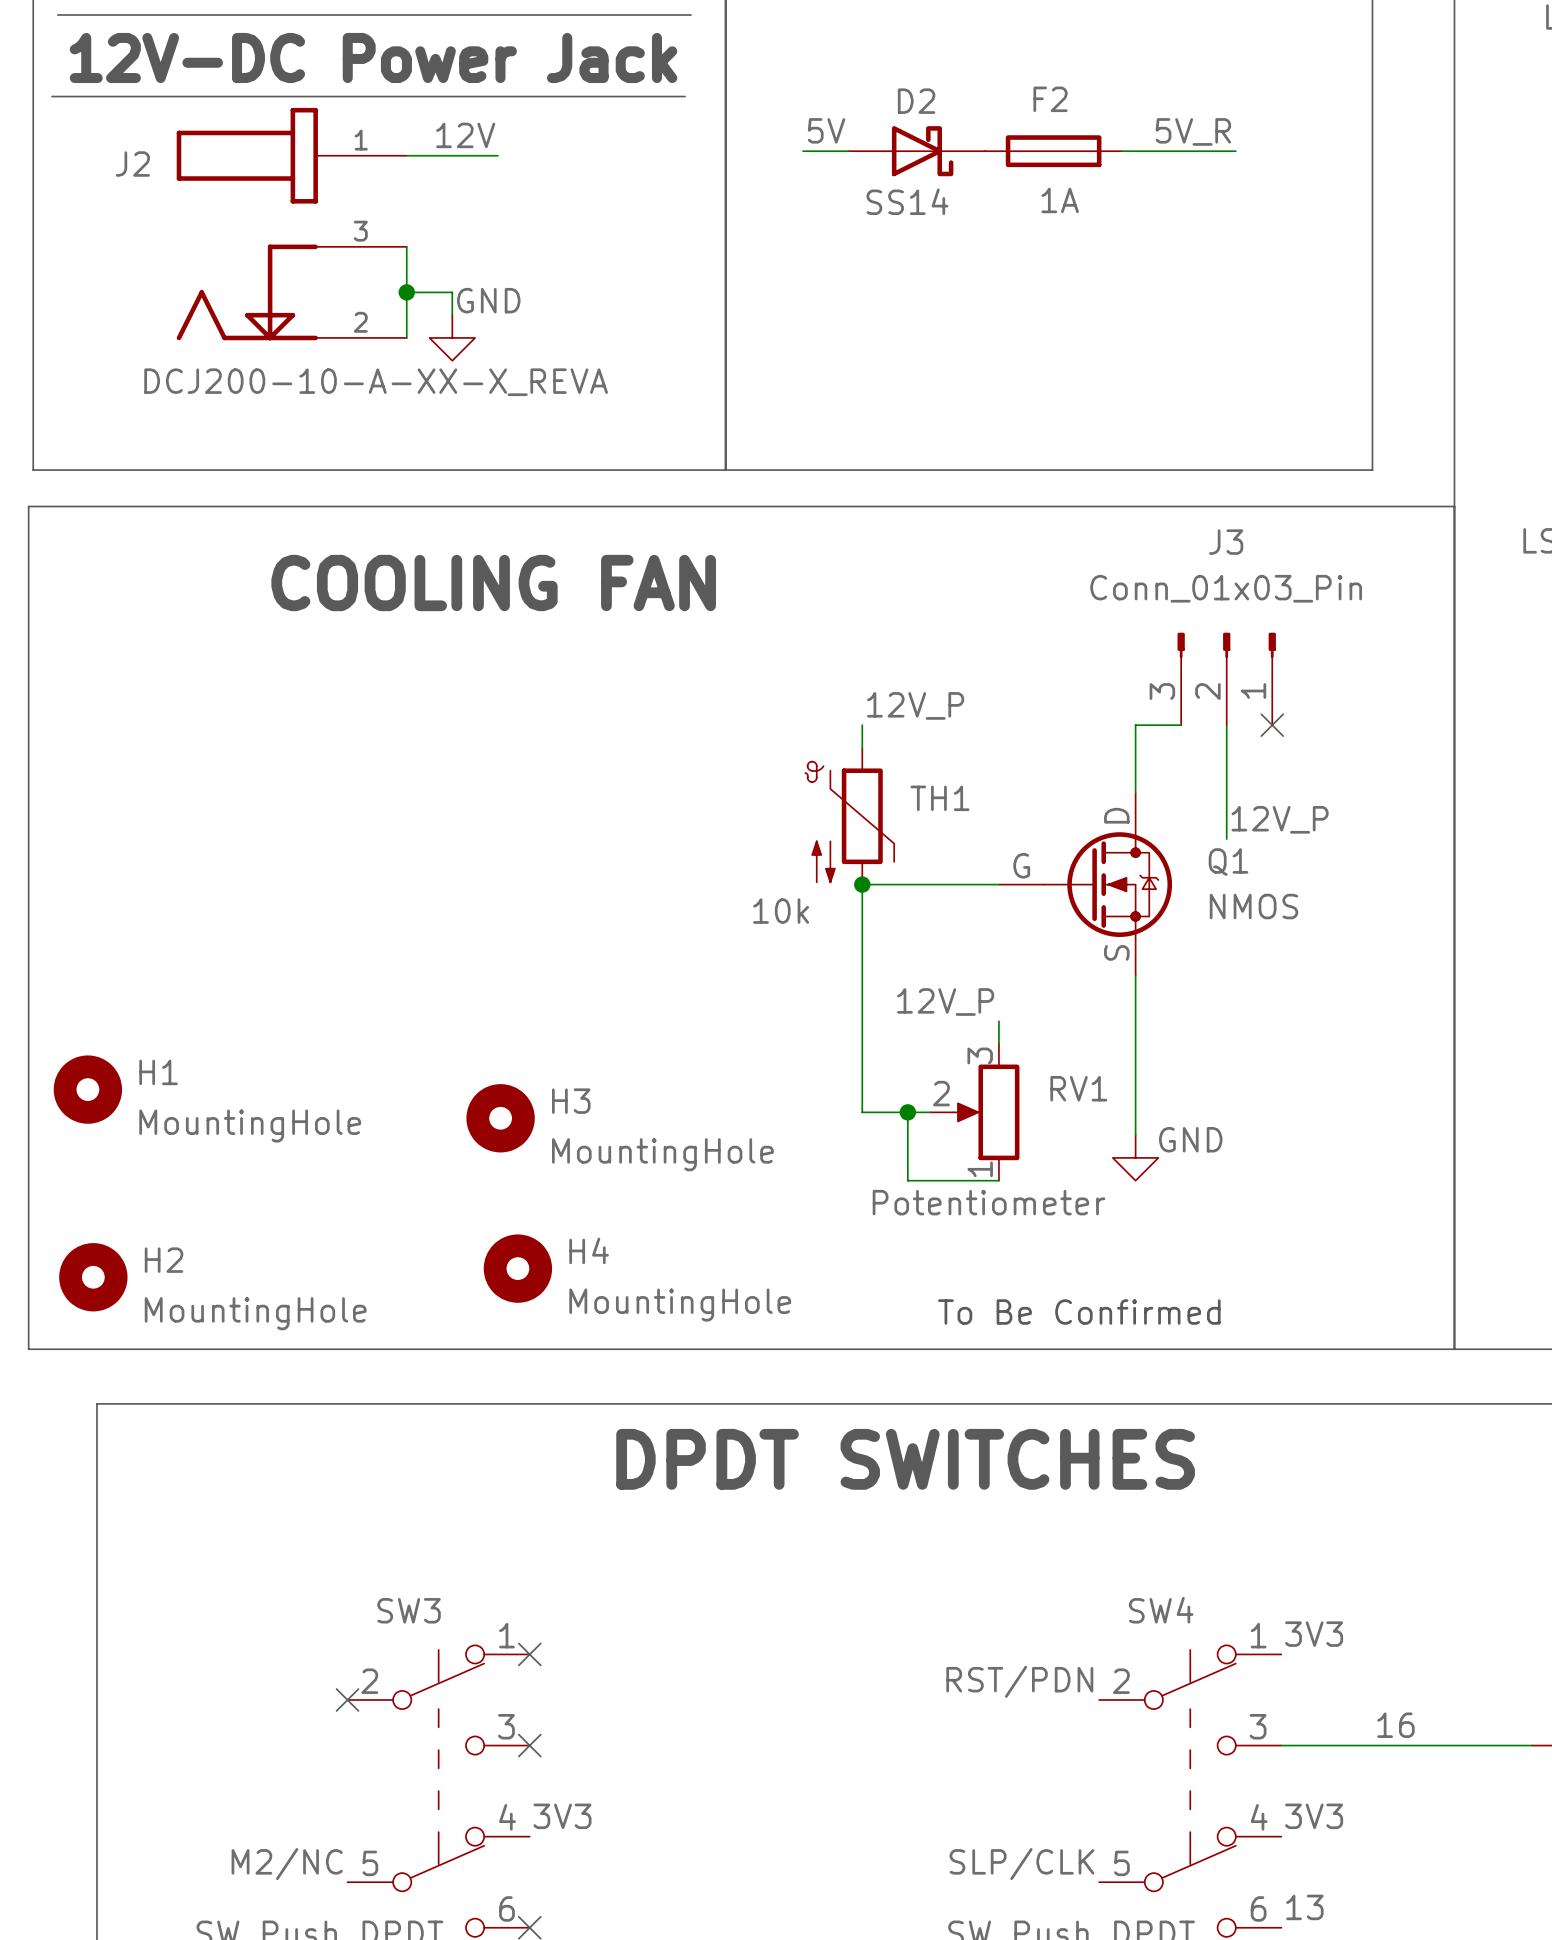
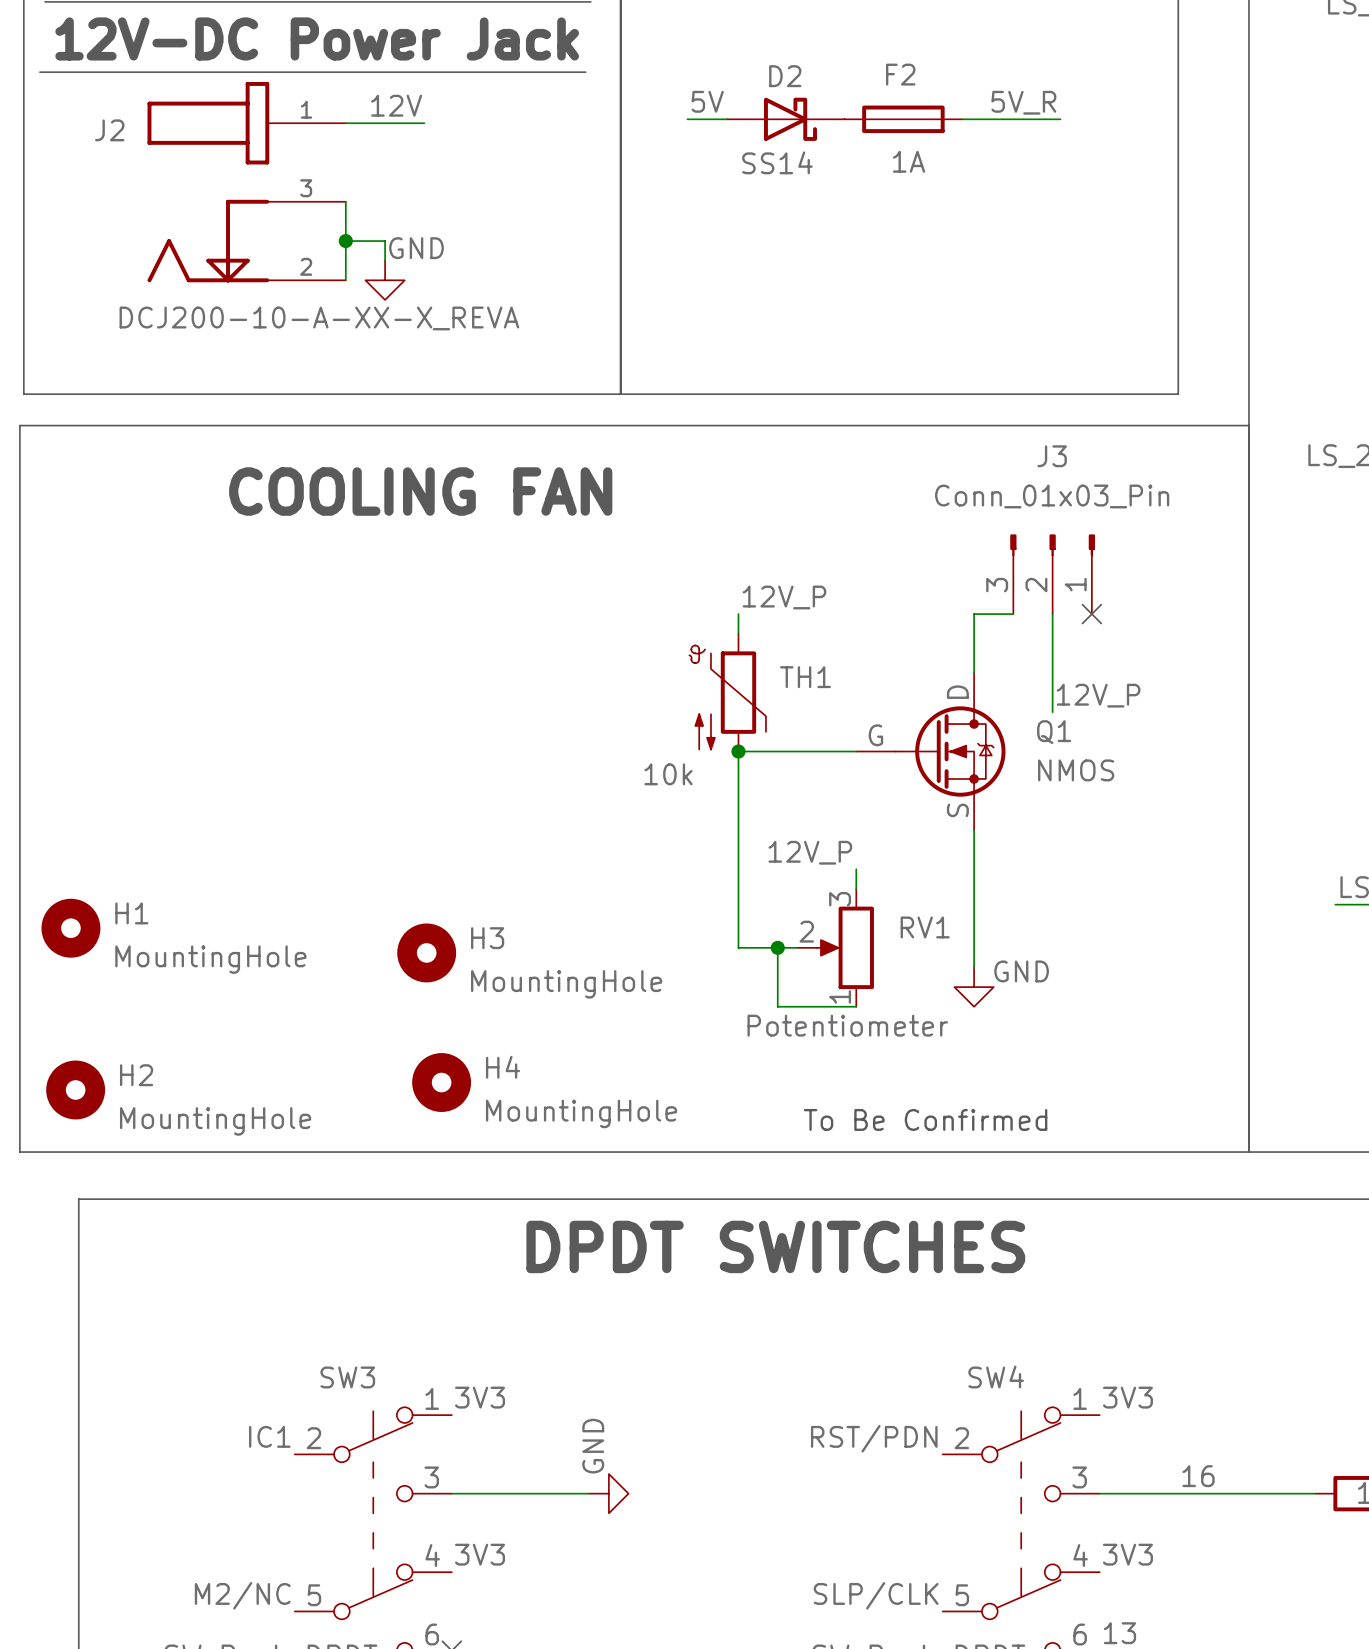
label: none -> 3V3 (480, 1397)
no-connect mark: (529, 1654) -> none
label: none -> IC1 (269, 1436)
no-connect mark: (347, 1700) -> none
wire: none -> (451, 1493) (589, 1493)
no-connect mark: (529, 1745) -> none
power symbol: none -> GND (608, 1493)

